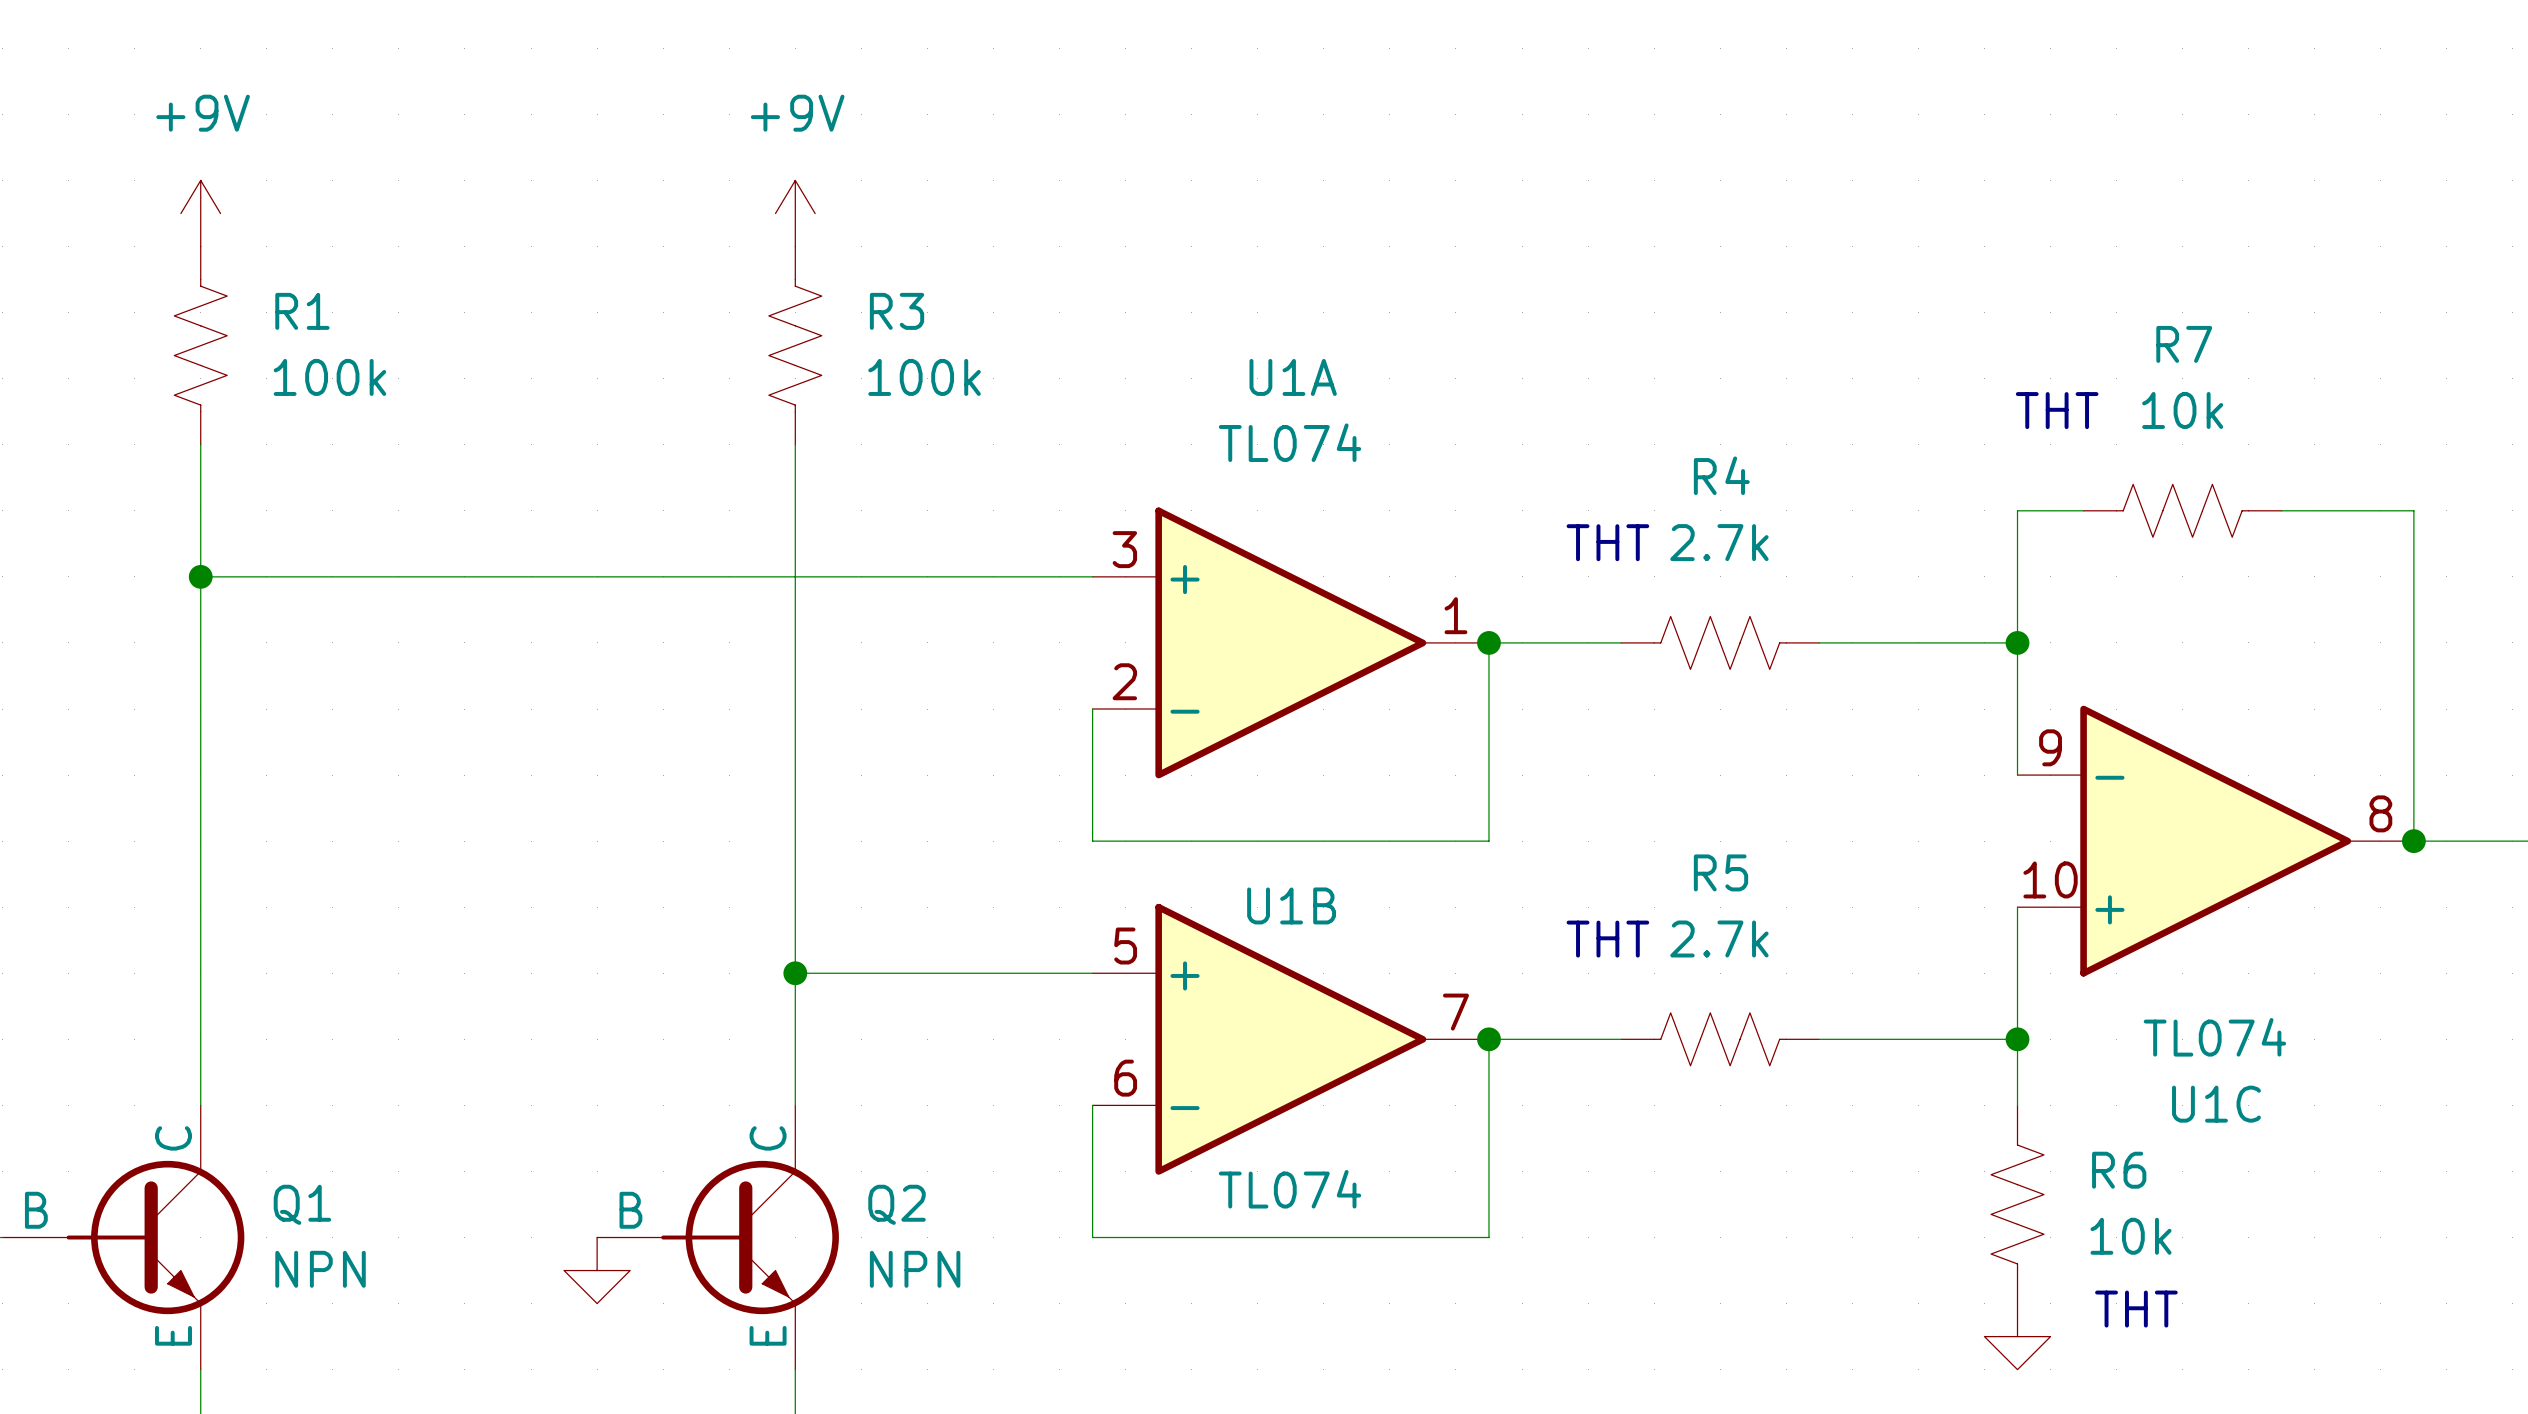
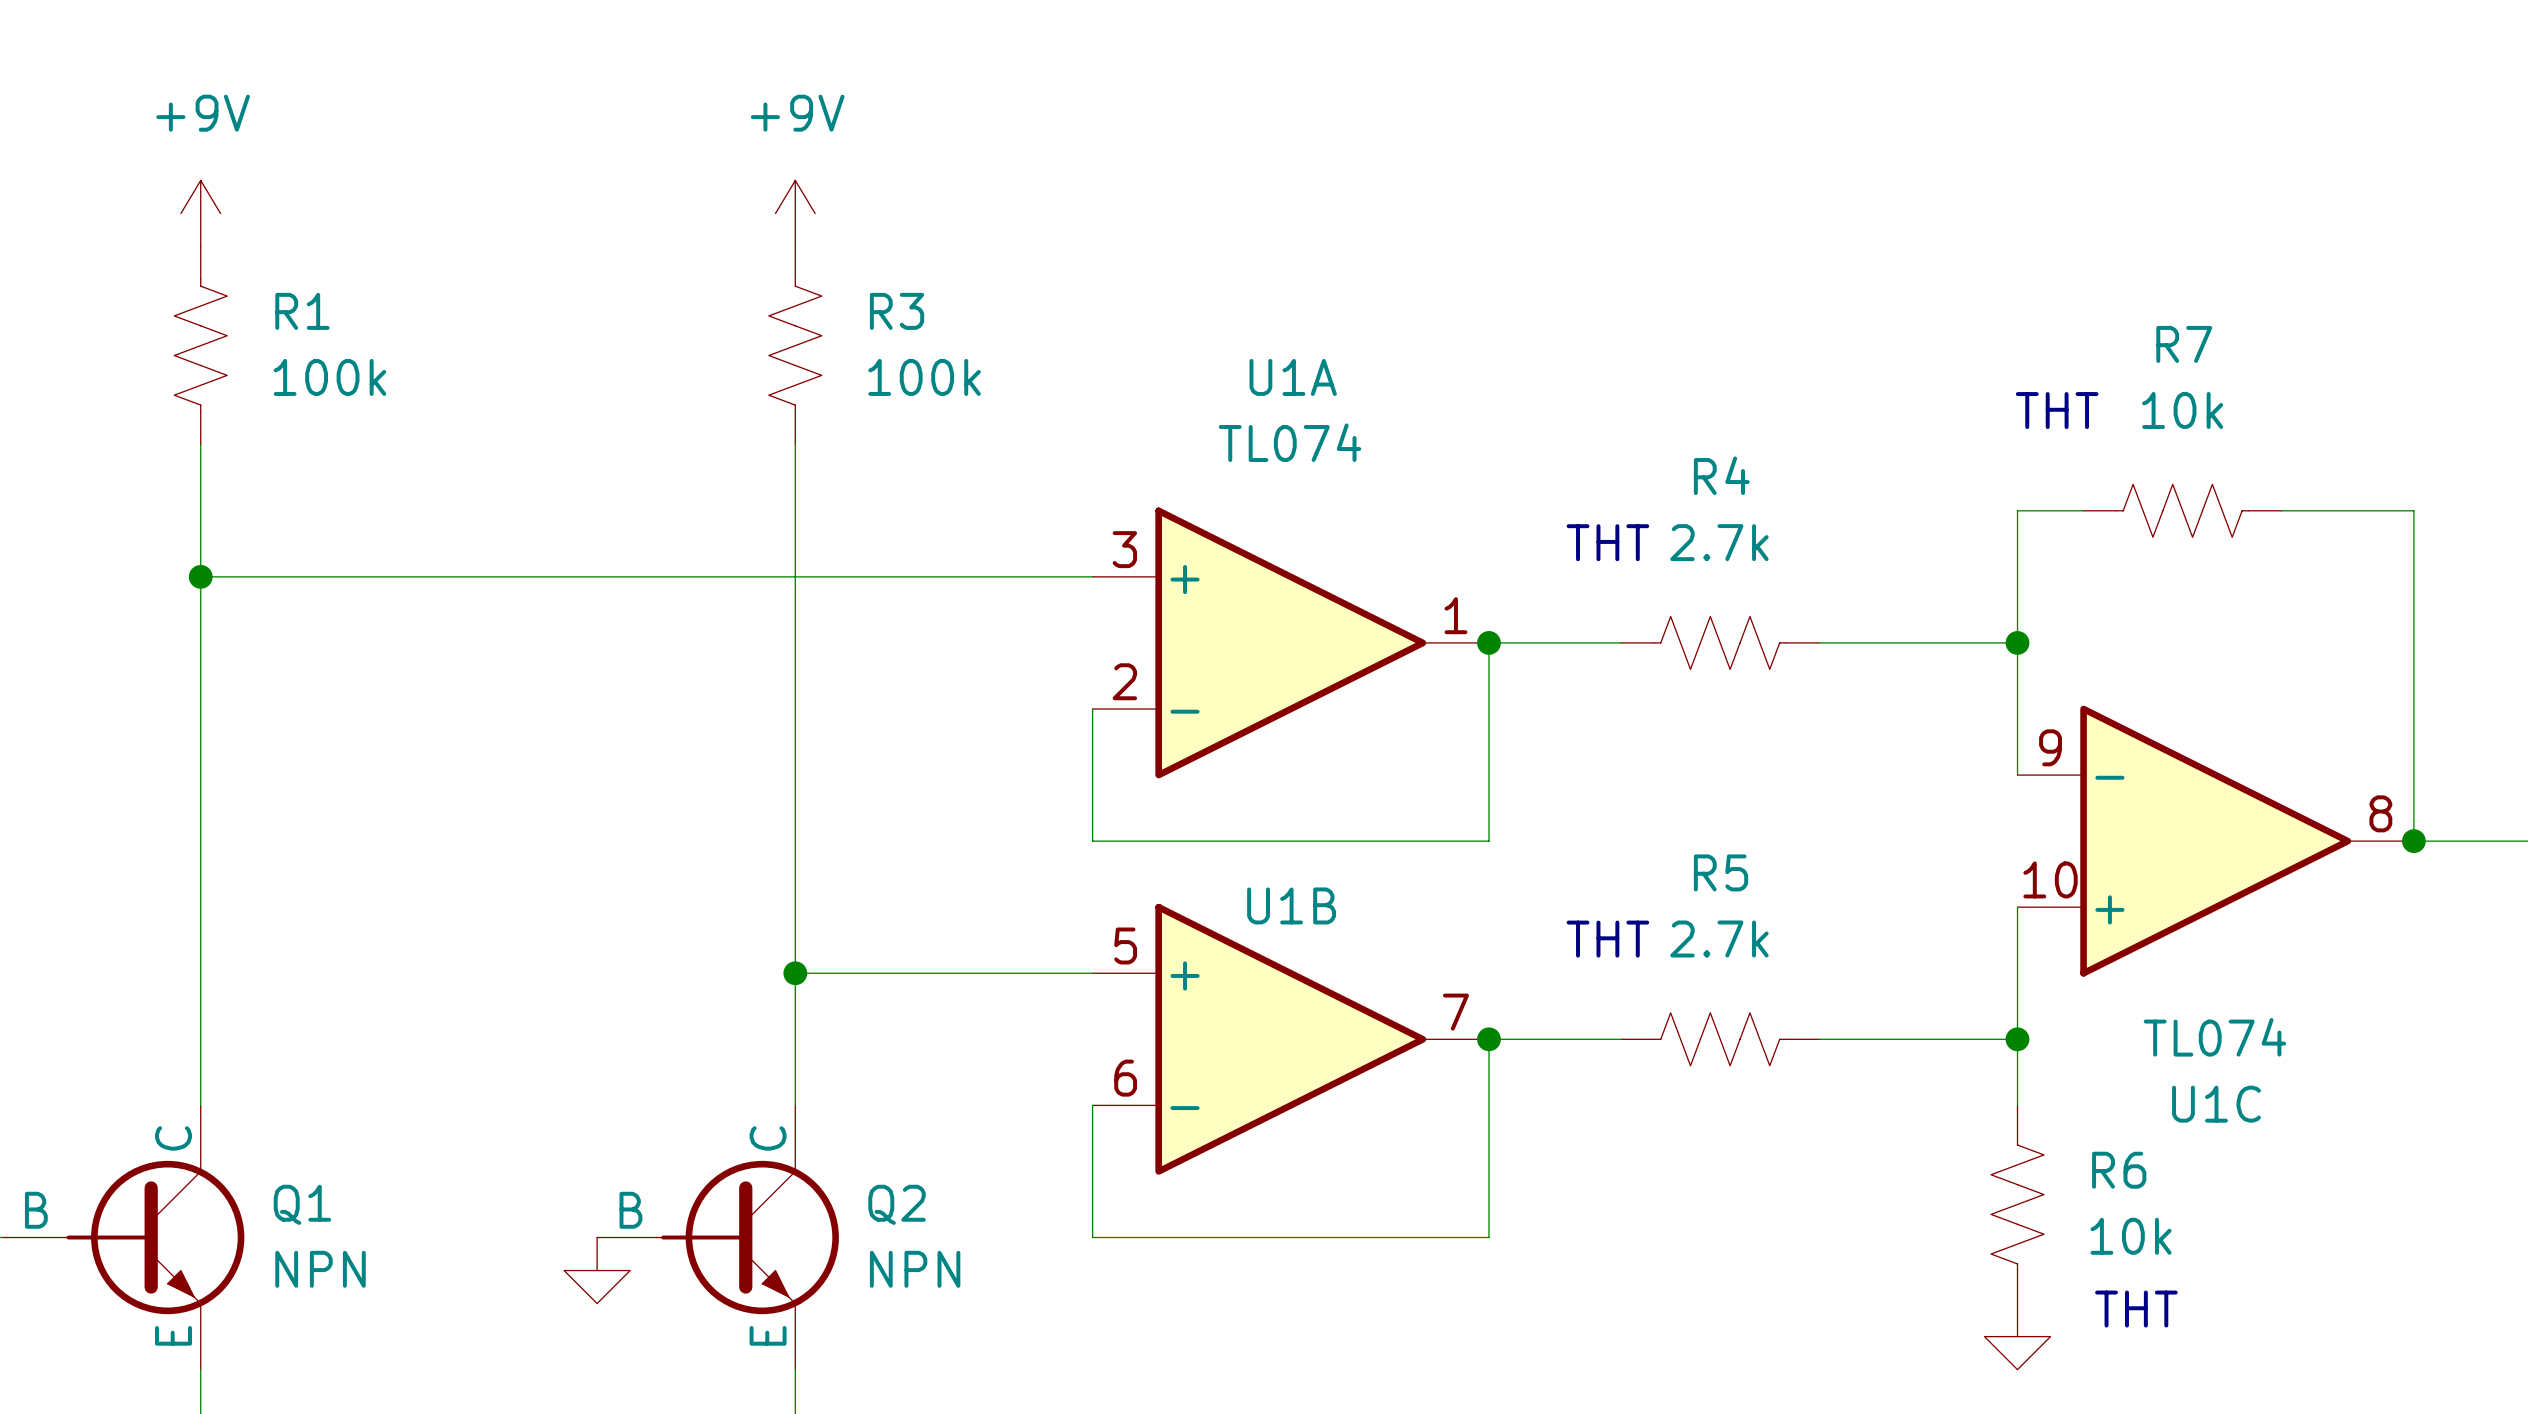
U1B value: TL074 (1290, 1189) -> none

